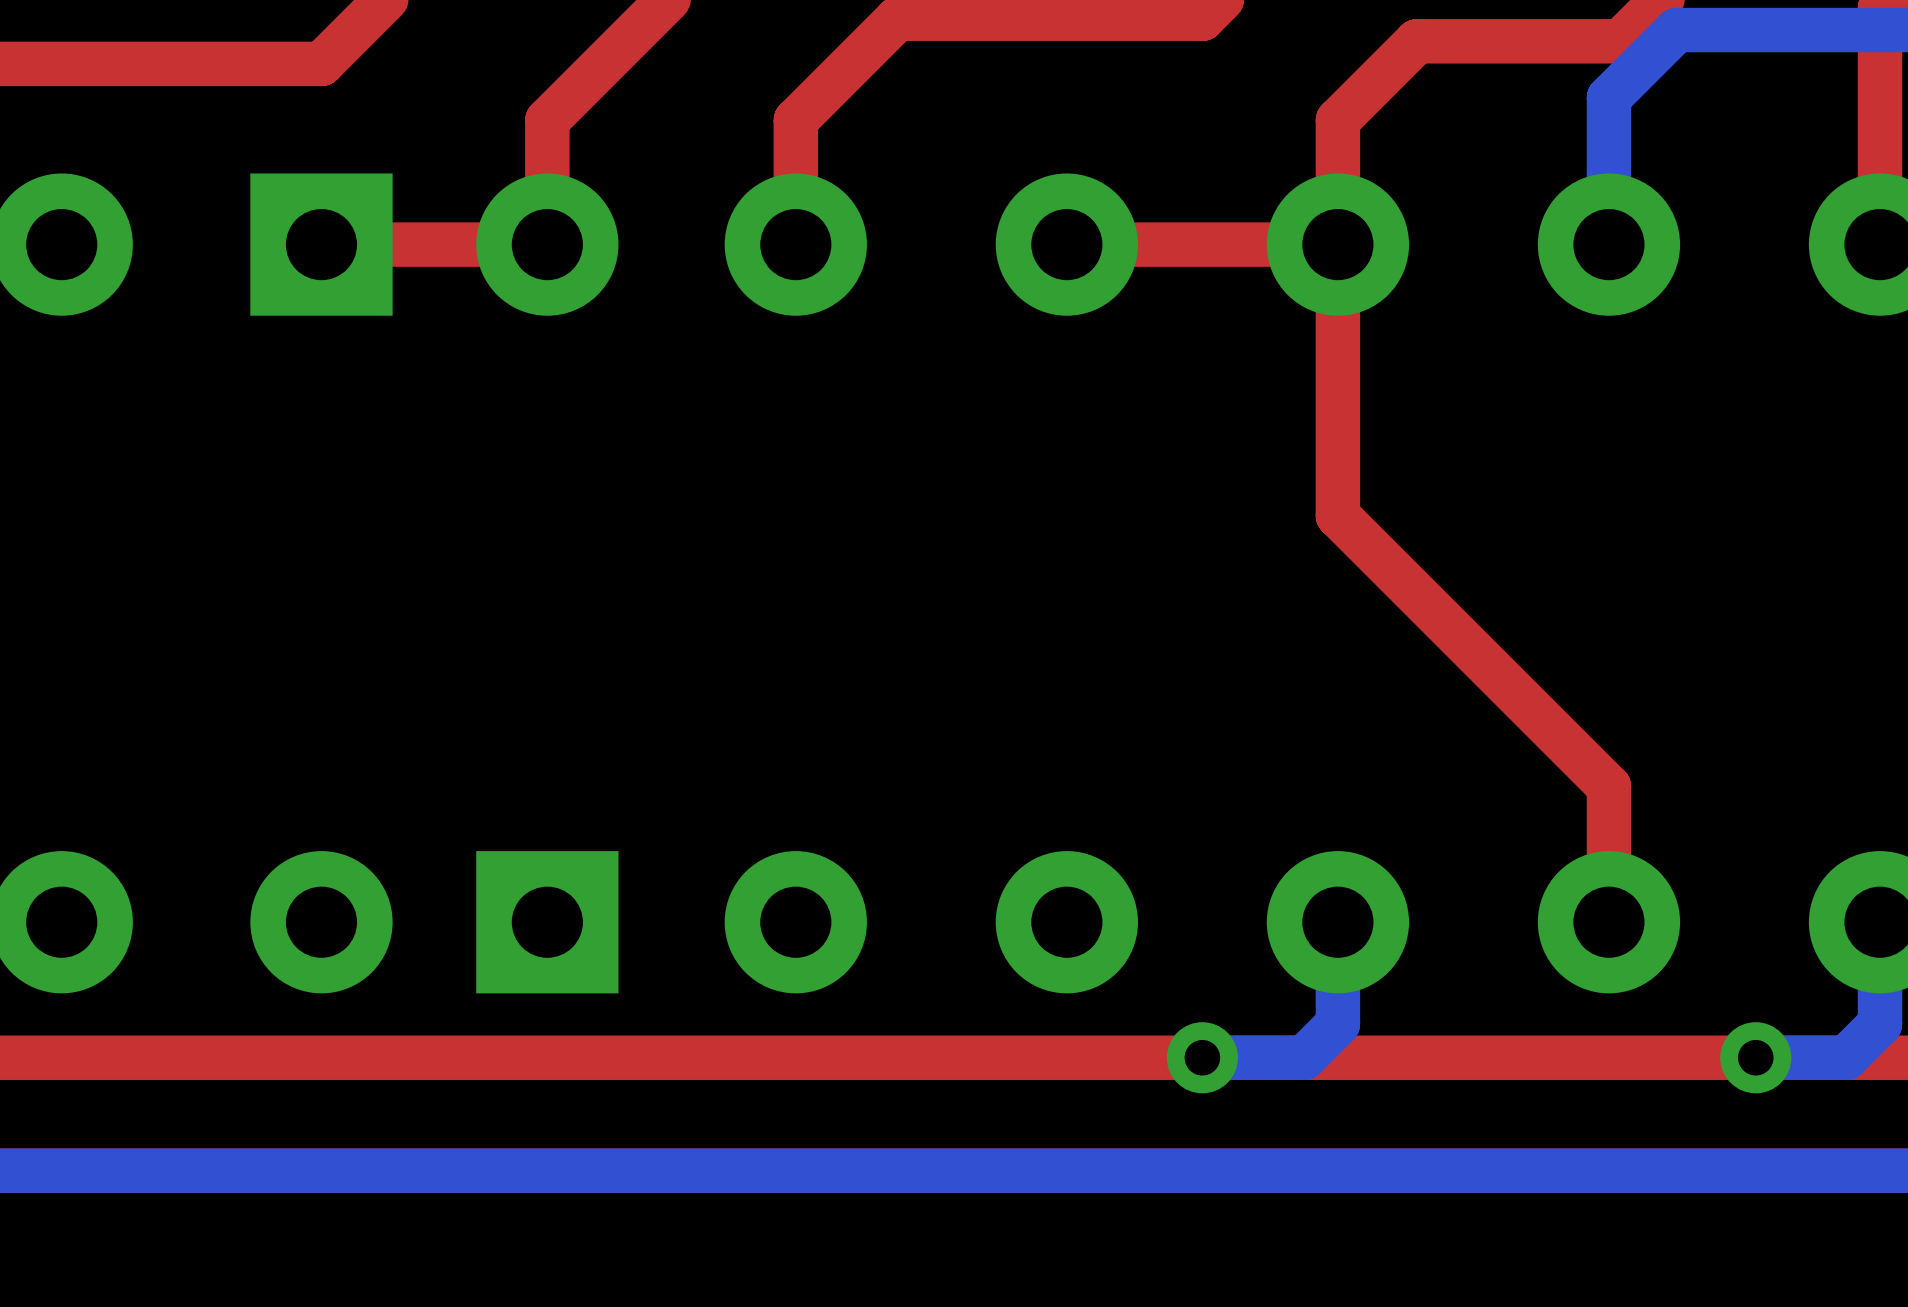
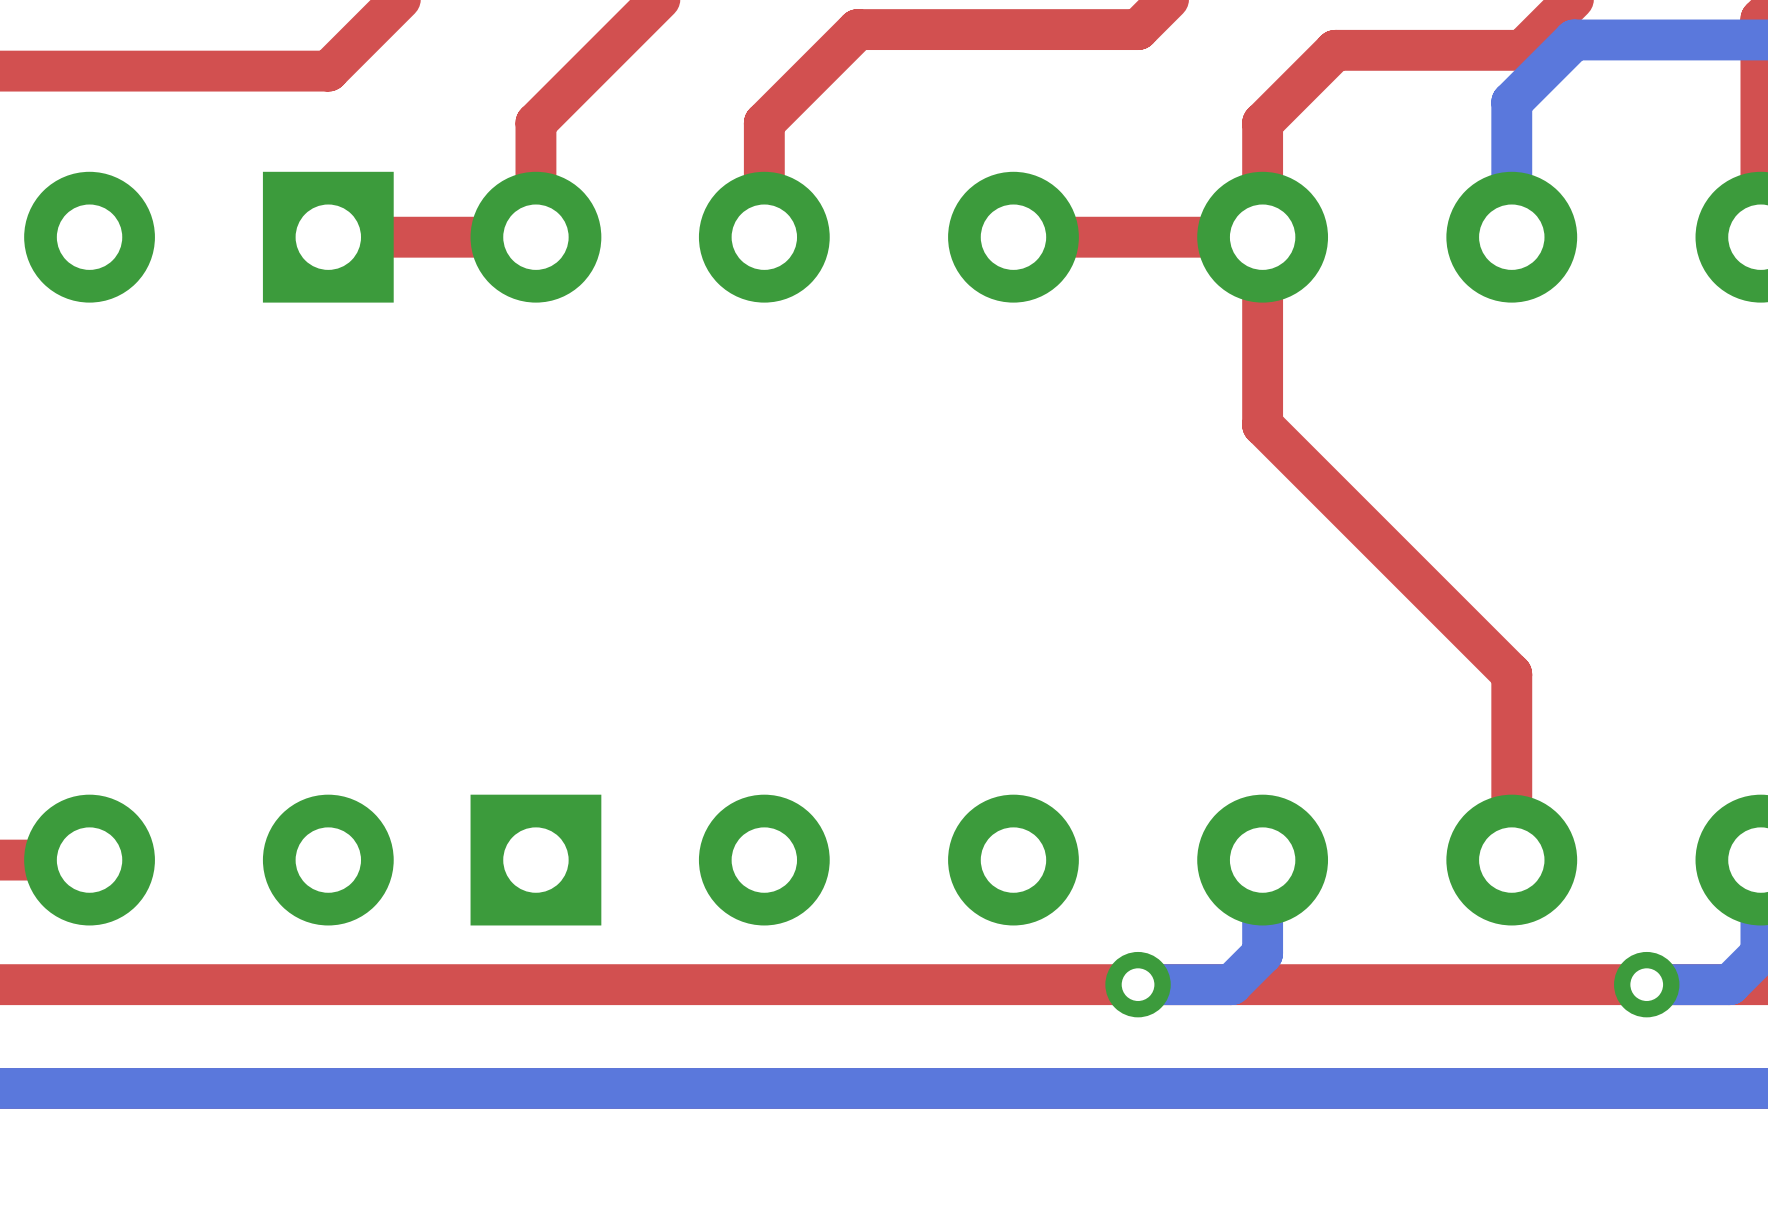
top track: (1337, 449) (1337, 515) (1608, 786) -> (1262, 425) (1511, 674) (1511, 735)

